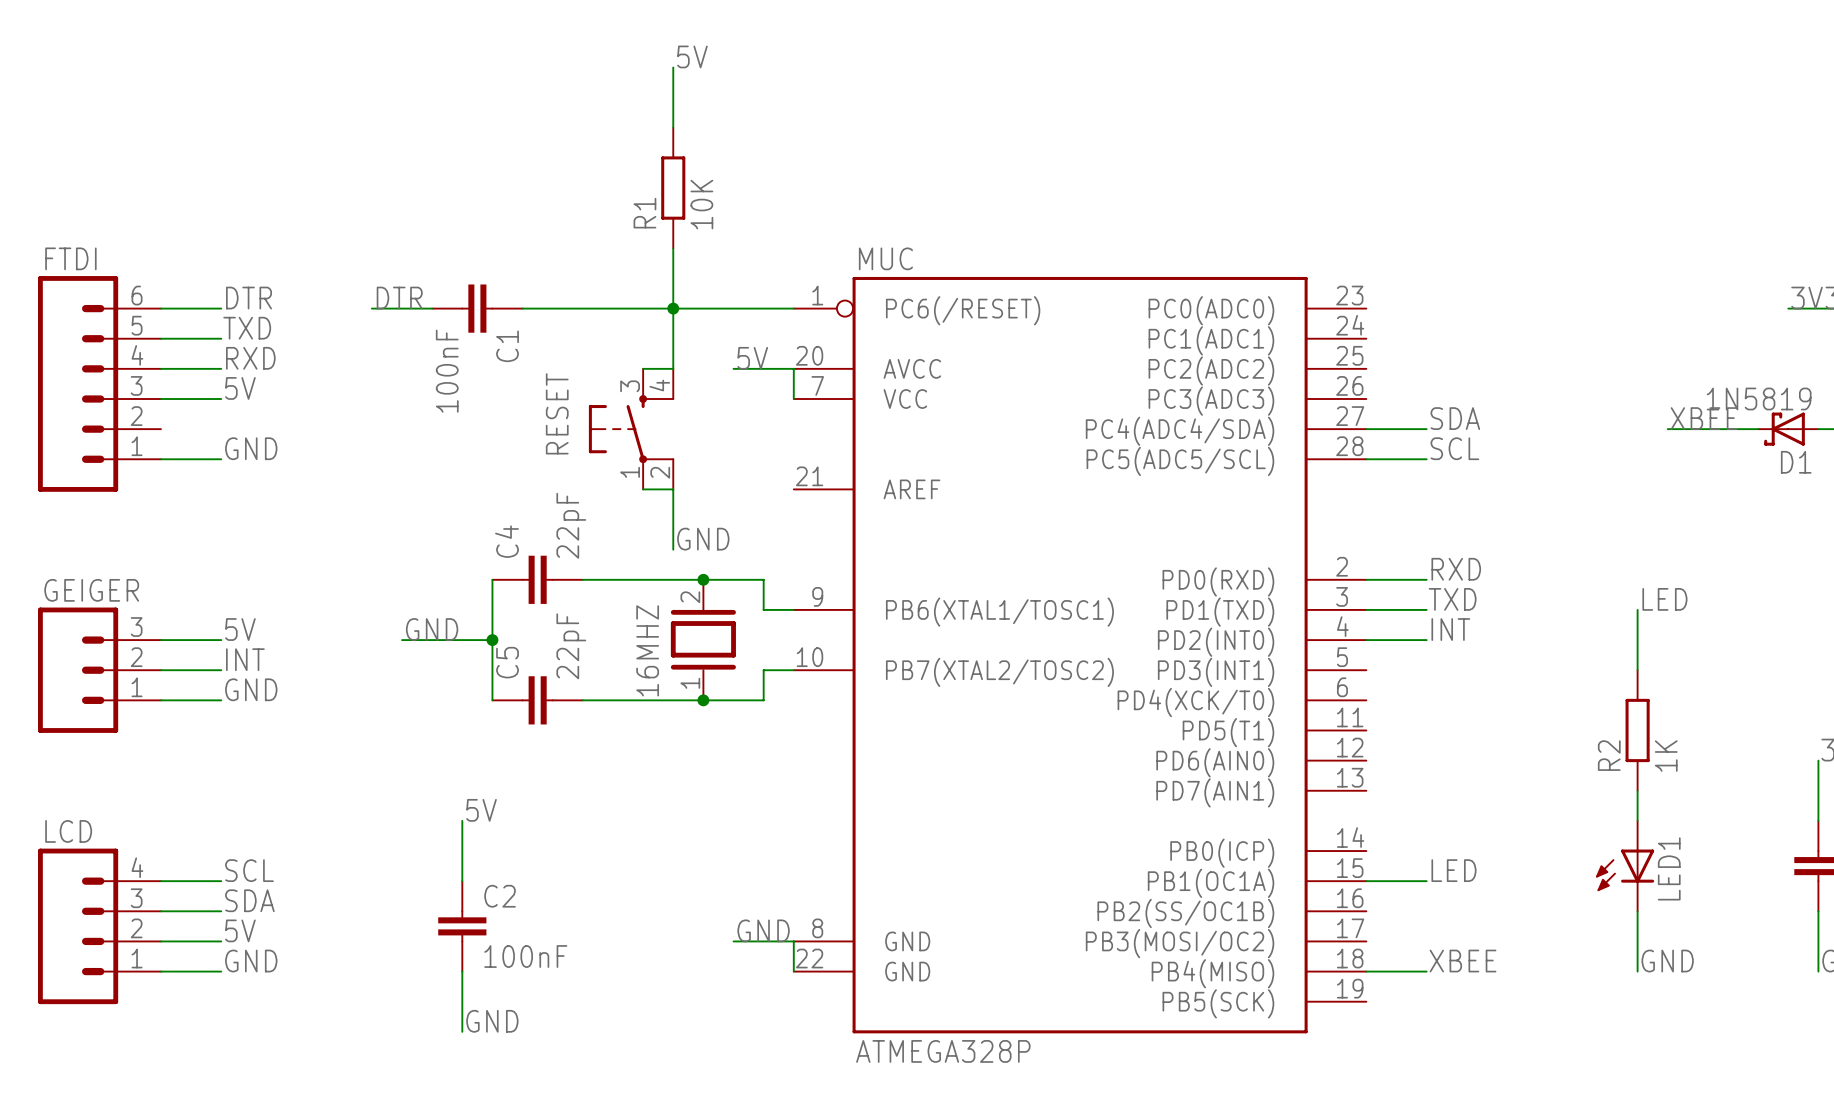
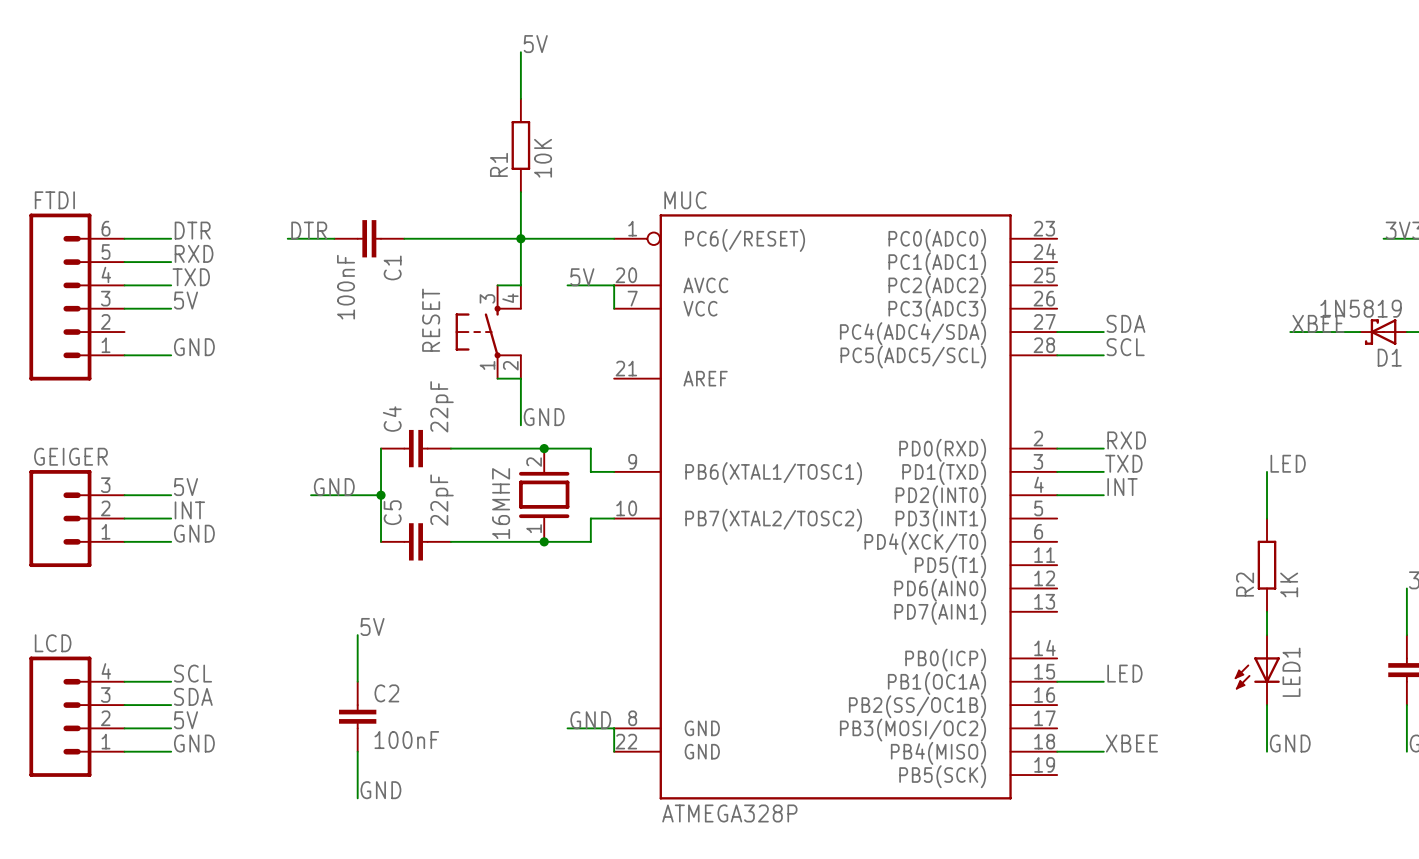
label: TXD (247, 328) -> RXD (194, 253)
label: RXD (250, 358) -> TXD (191, 277)

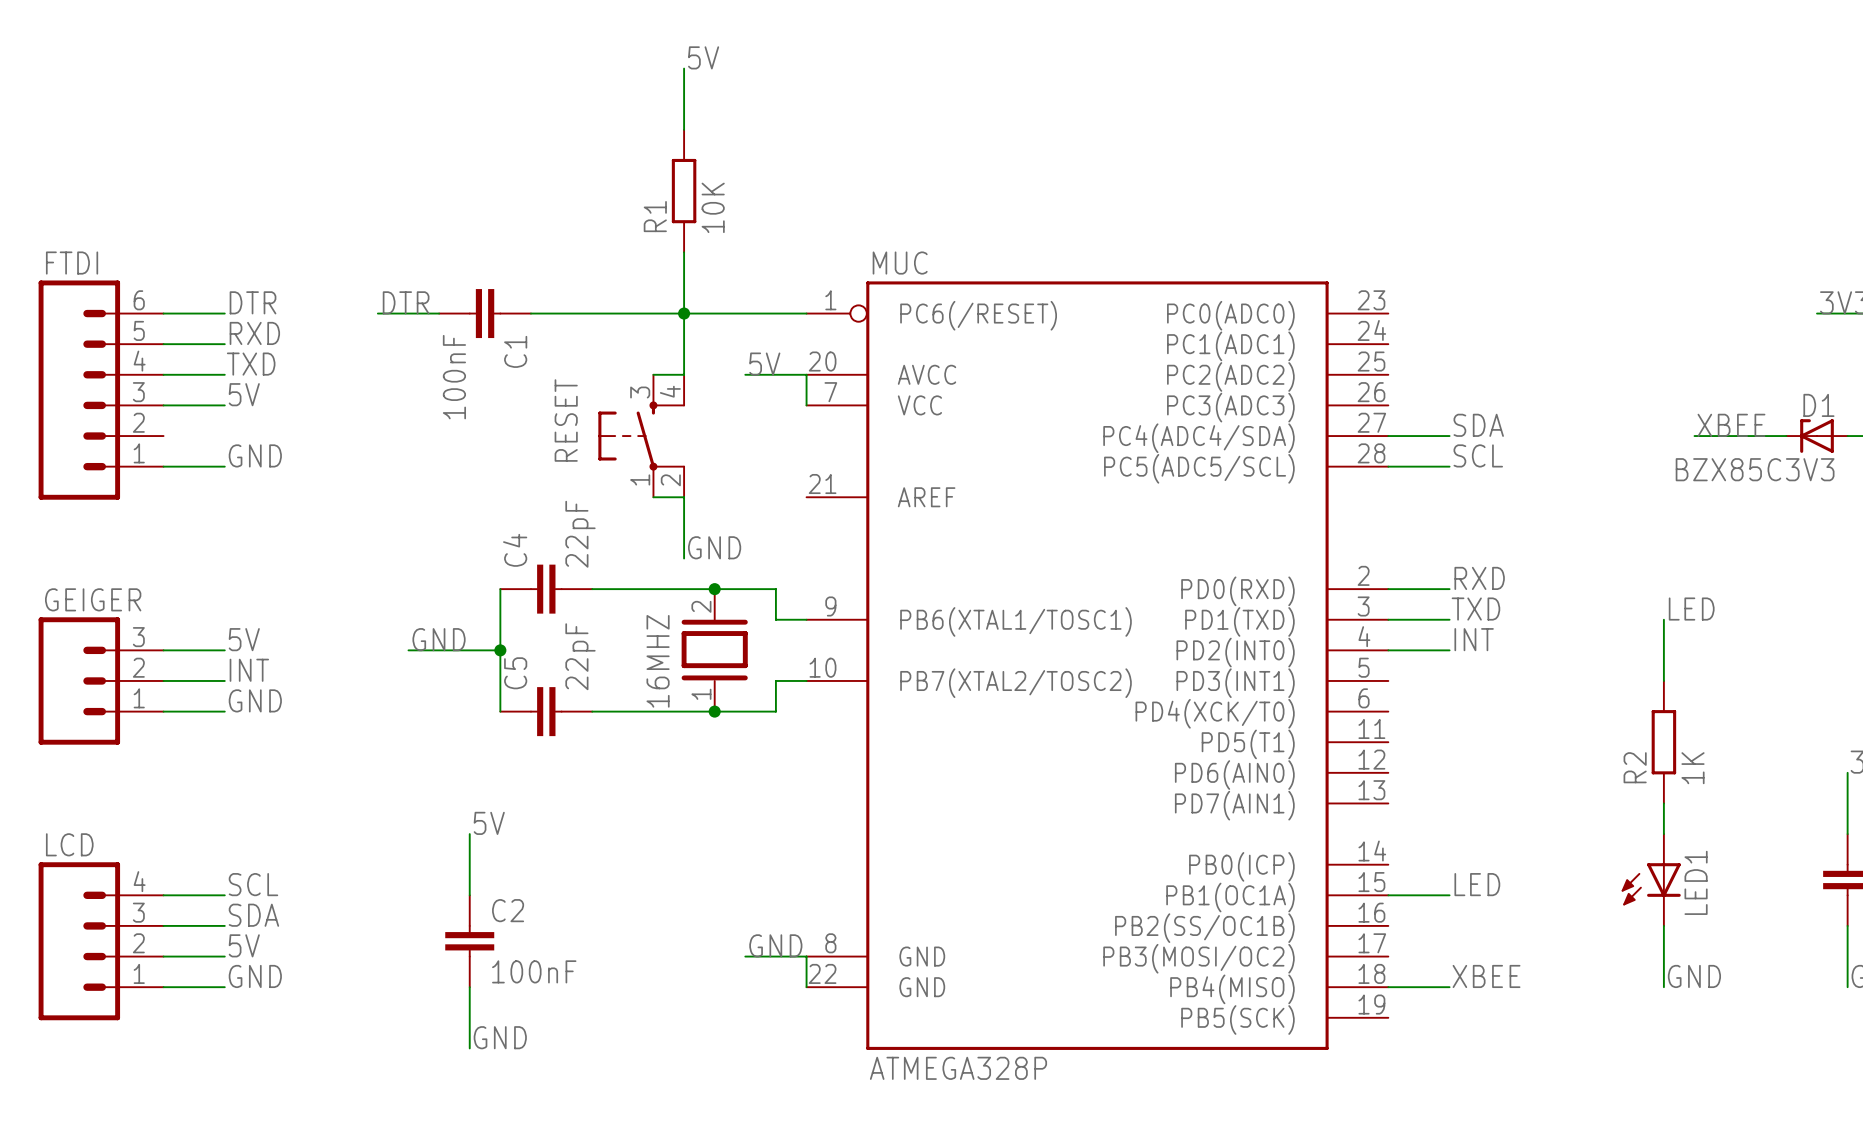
D1: 1N5819 (1383, 332) -> none
BZX85C3V3: none -> D1 (1817, 436)

